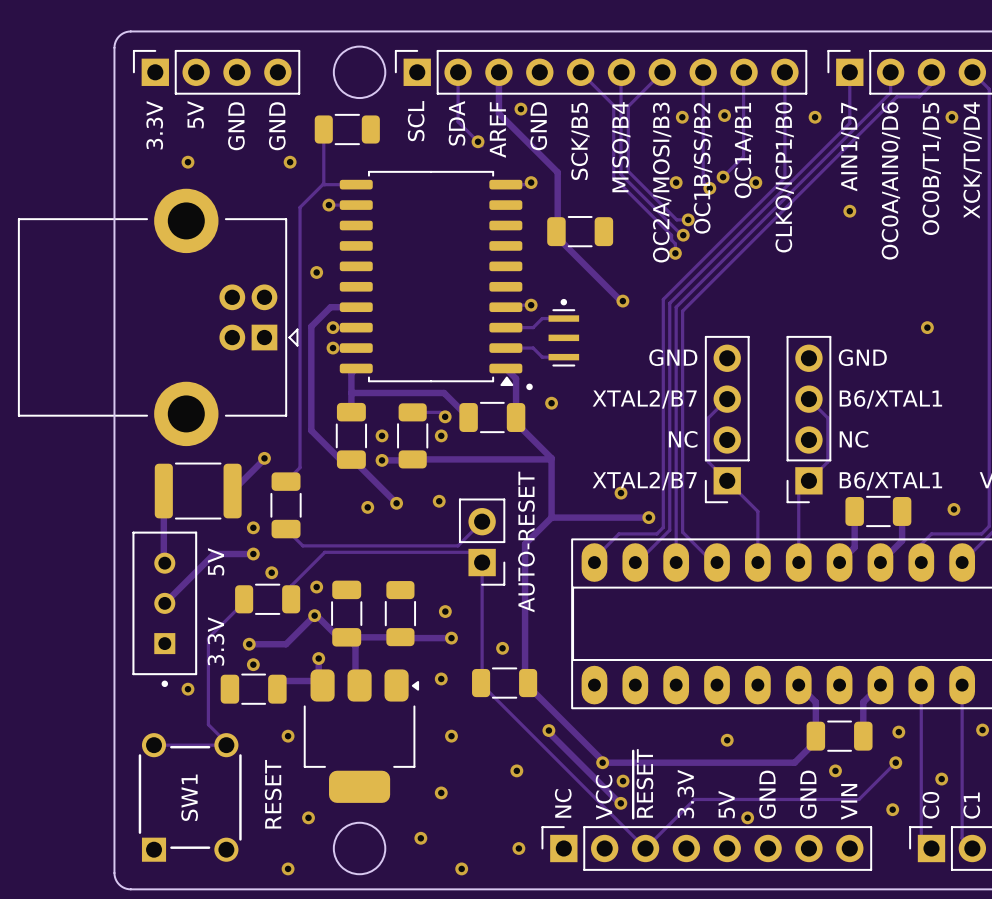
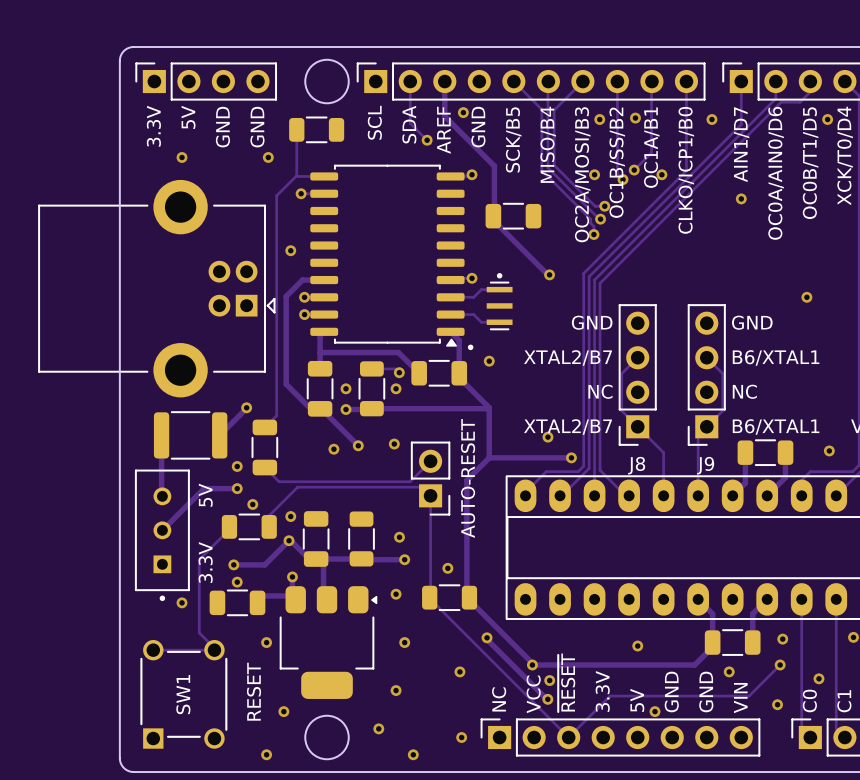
J8 name: none -> J8 (636, 465)
J9 name: none -> J9 (705, 465)

